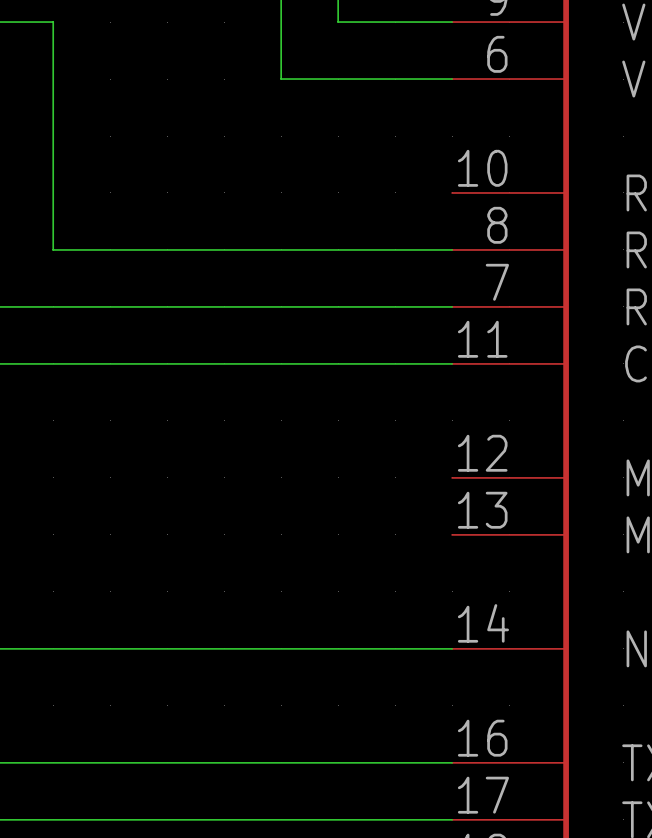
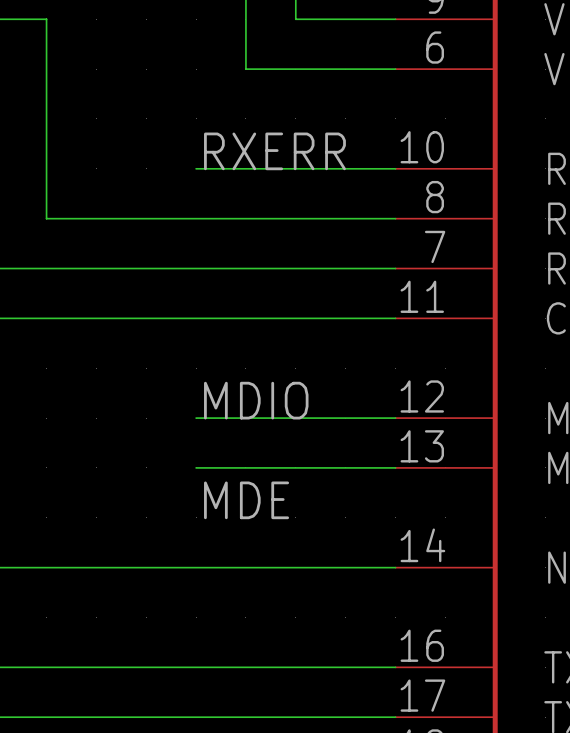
label: none -> RXERR (274, 151)
wire: none -> (196, 168) (395, 168)
label: none -> MDIO (256, 400)
wire: none -> (196, 418) (395, 418)
wire: none -> (196, 467) (395, 467)
label: none -> MDE (246, 500)

